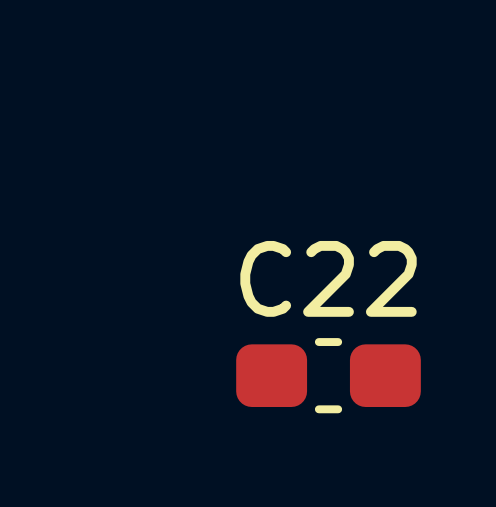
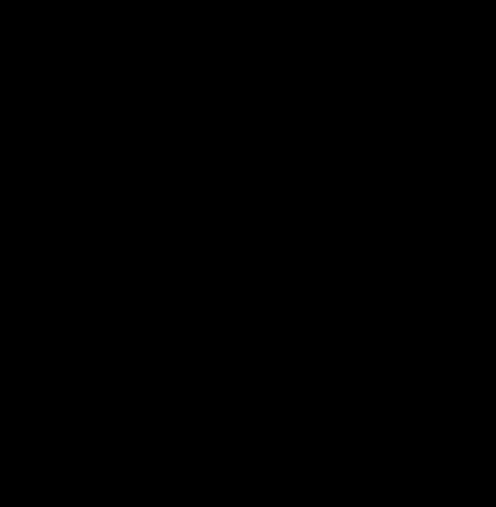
C22: (328, 375) -> none

